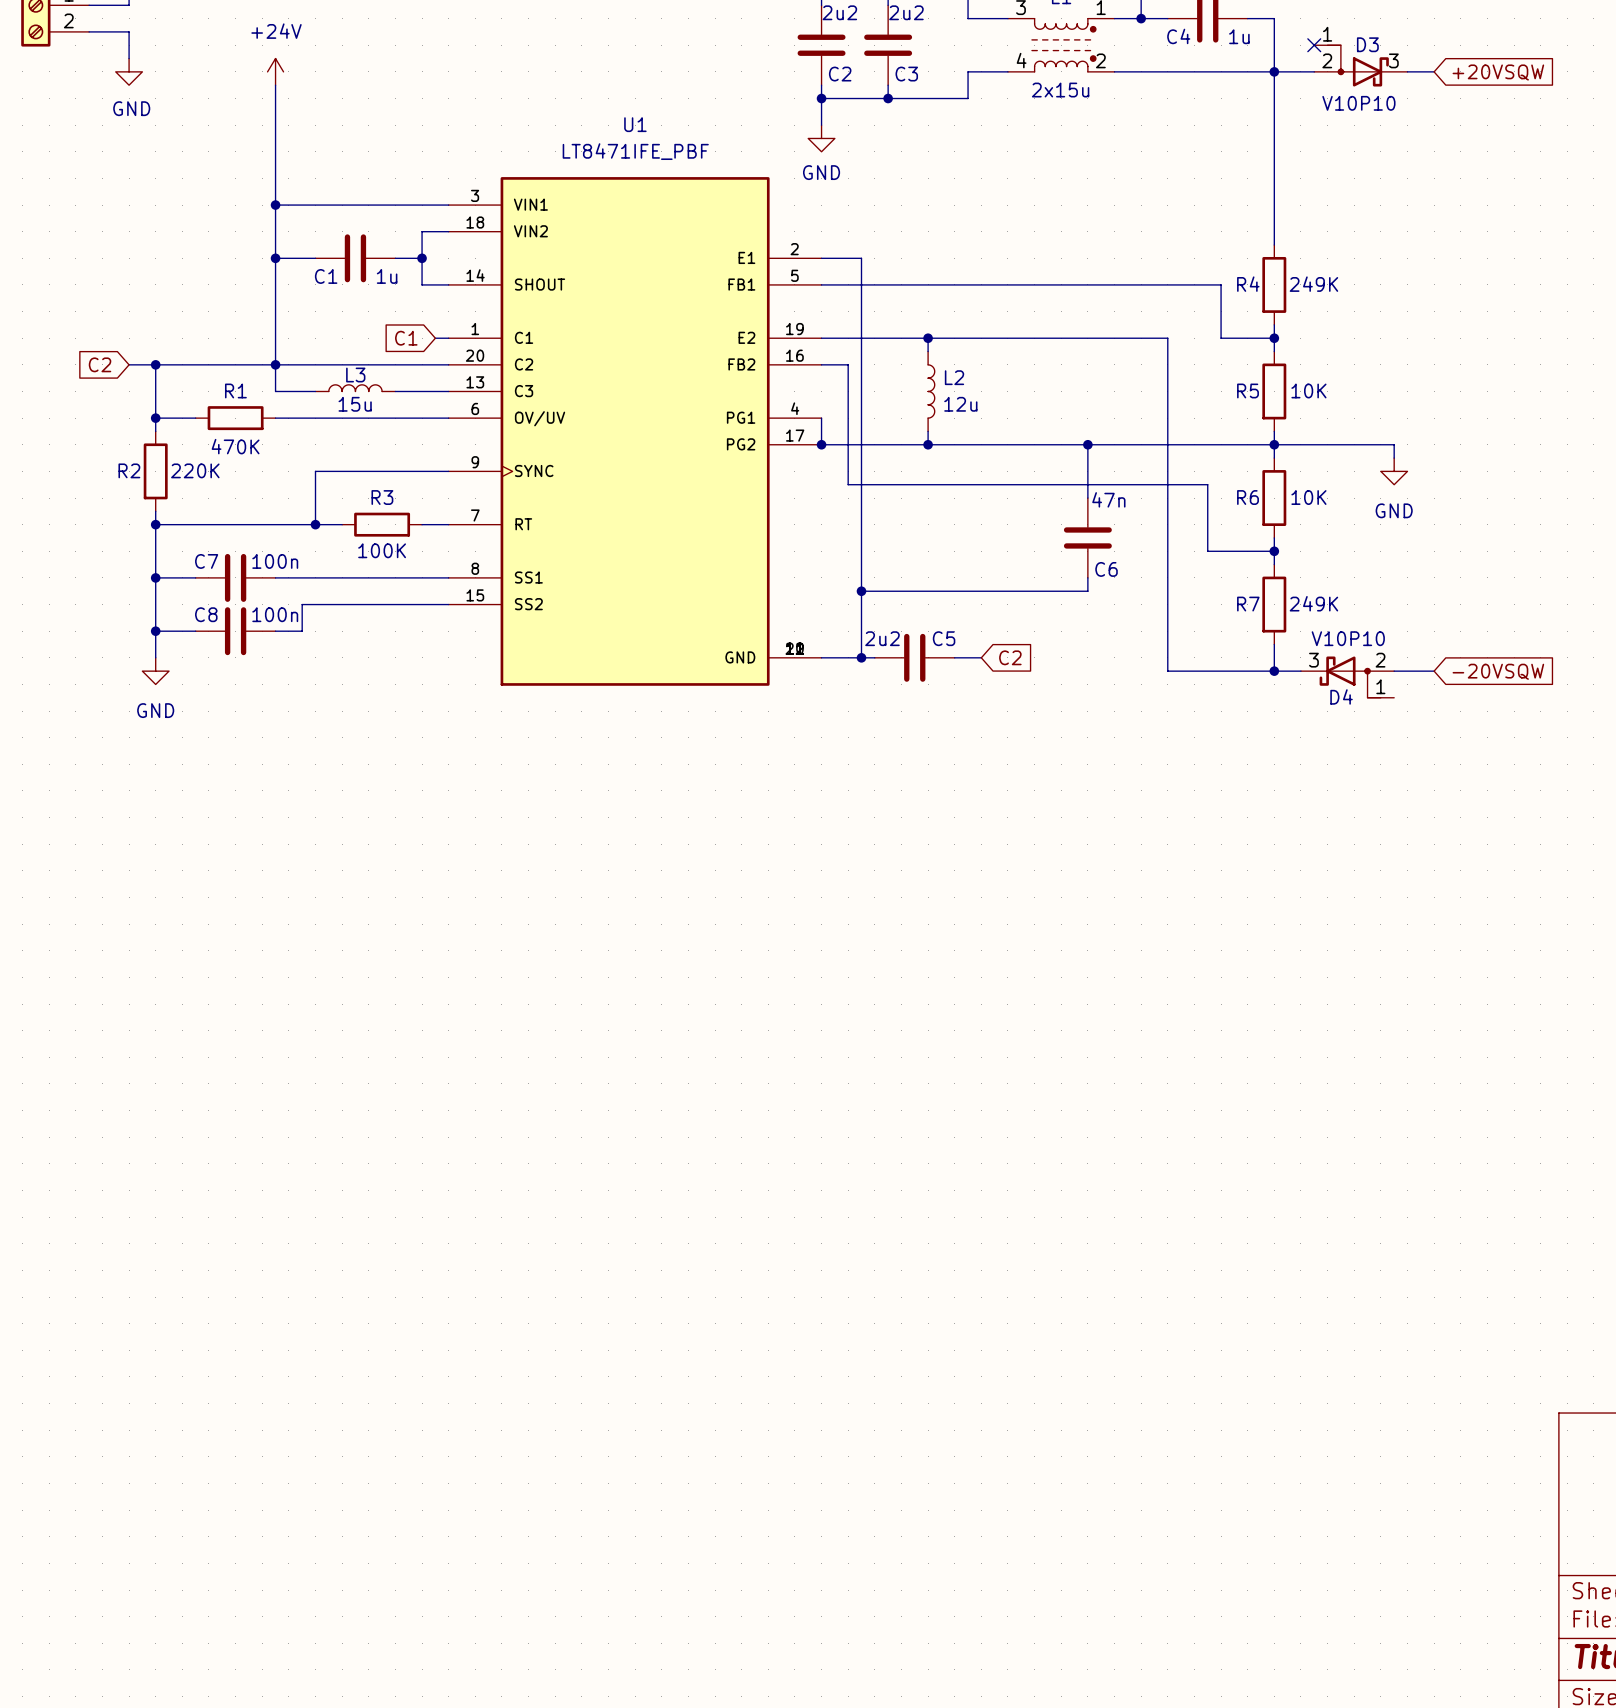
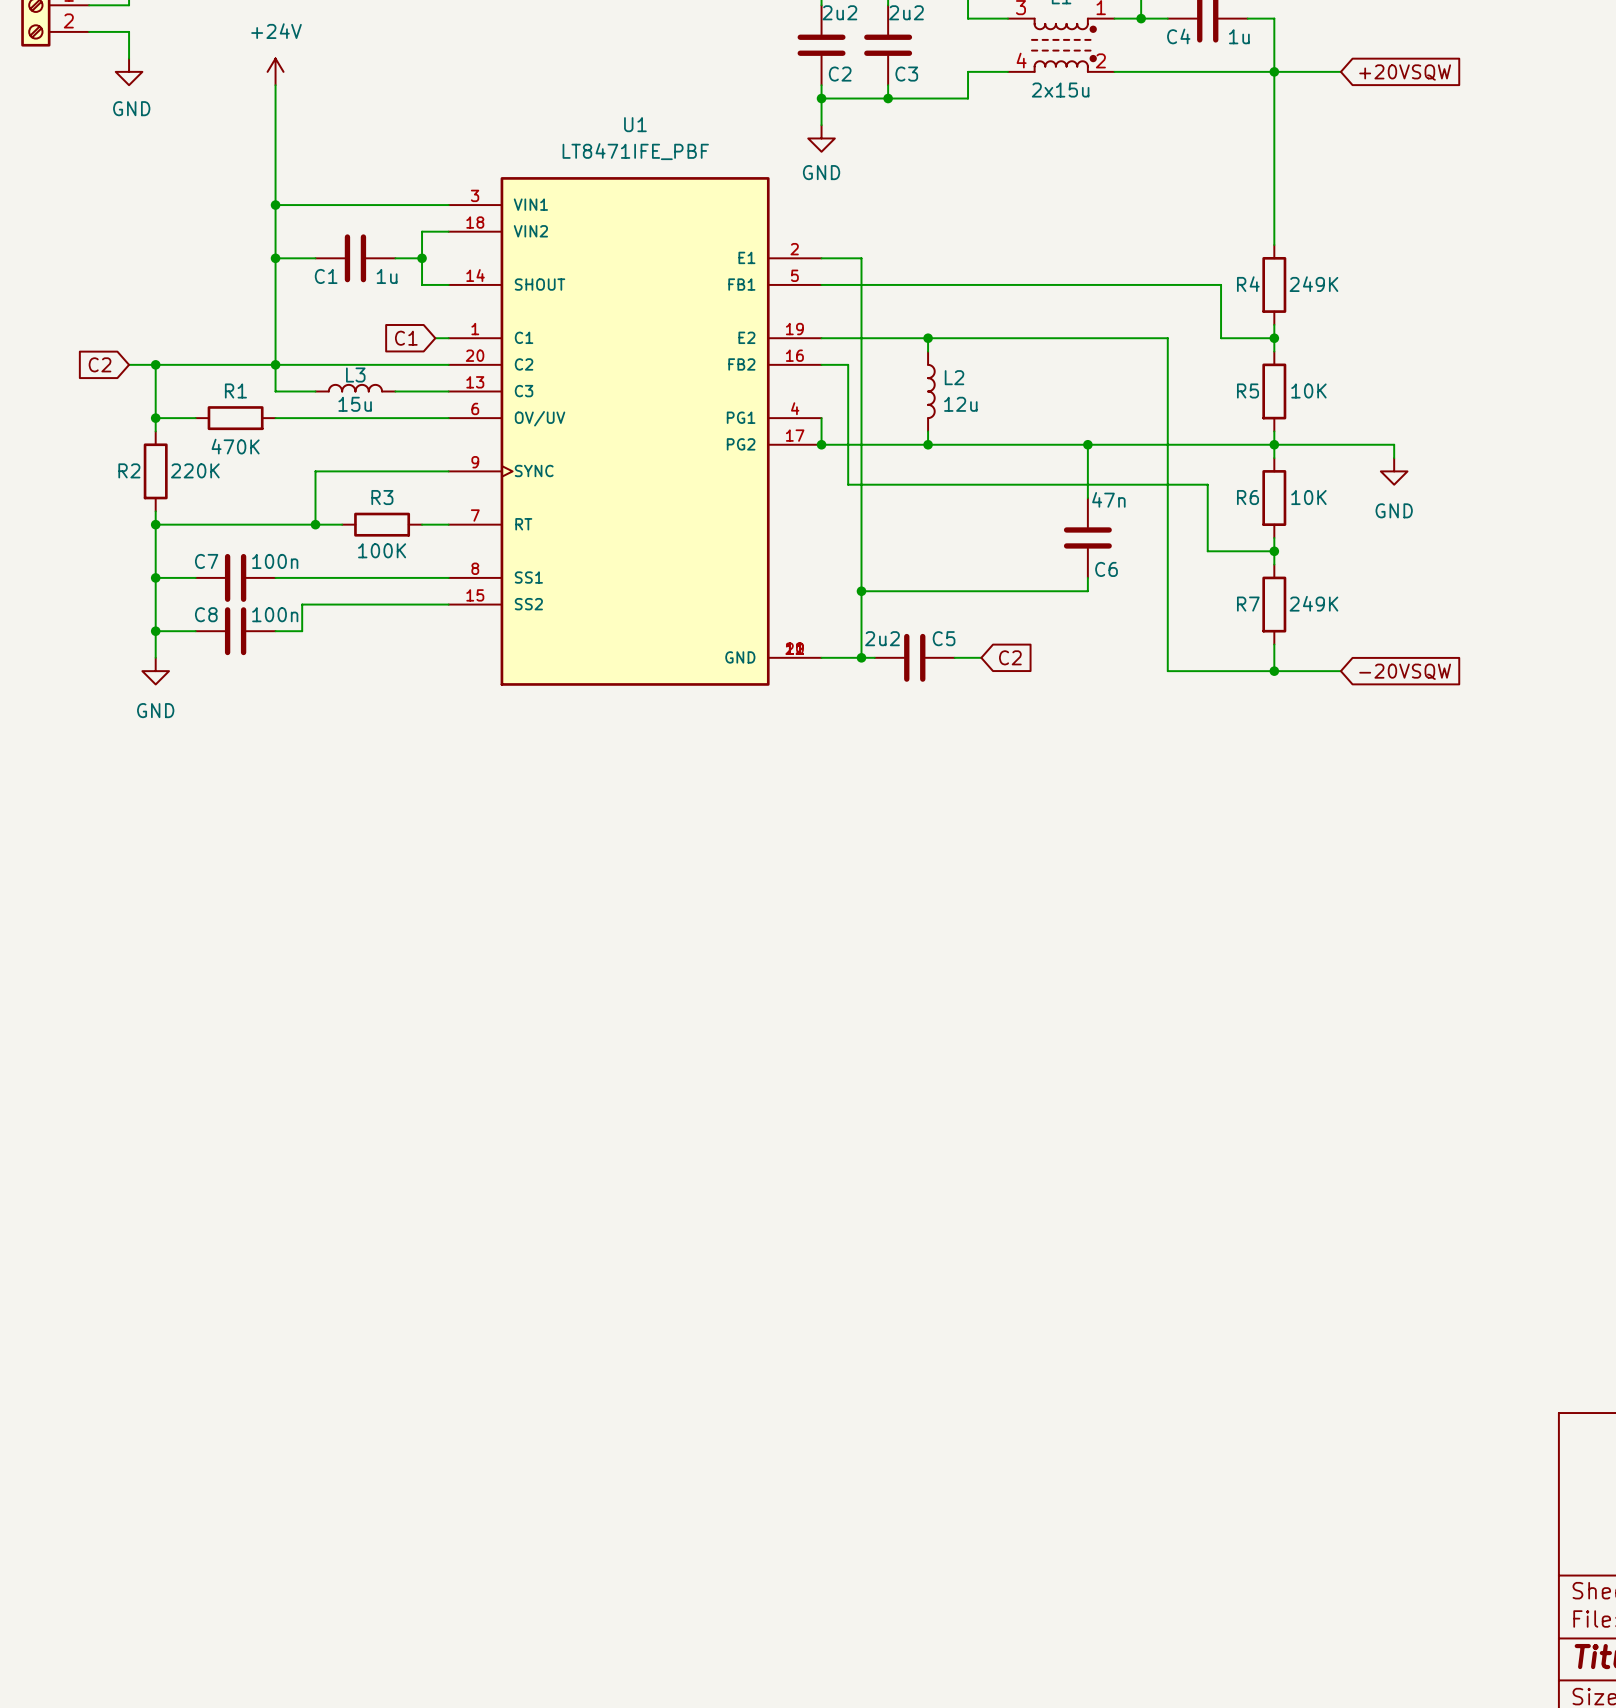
no-connect mark: (1314, 45) -> none
D3: V10P10 (1360, 65) -> none
global label position: +20VSQW (1498, 72) -> +20VSQW (1405, 72)
global label position: -20VSQW (1498, 671) -> -20VSQW (1405, 671)
D4: V10P10 (1347, 677) -> none

